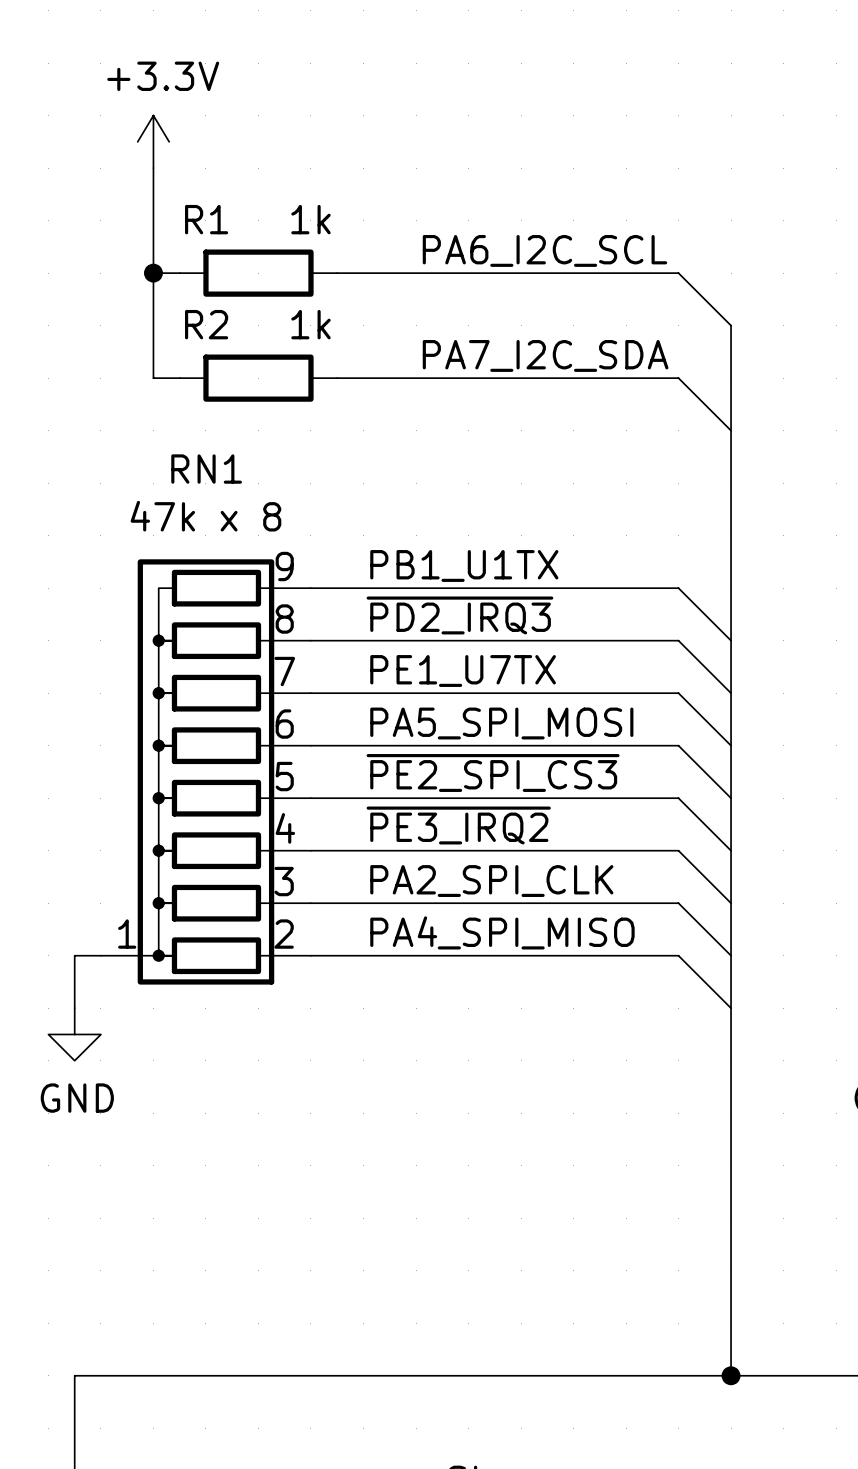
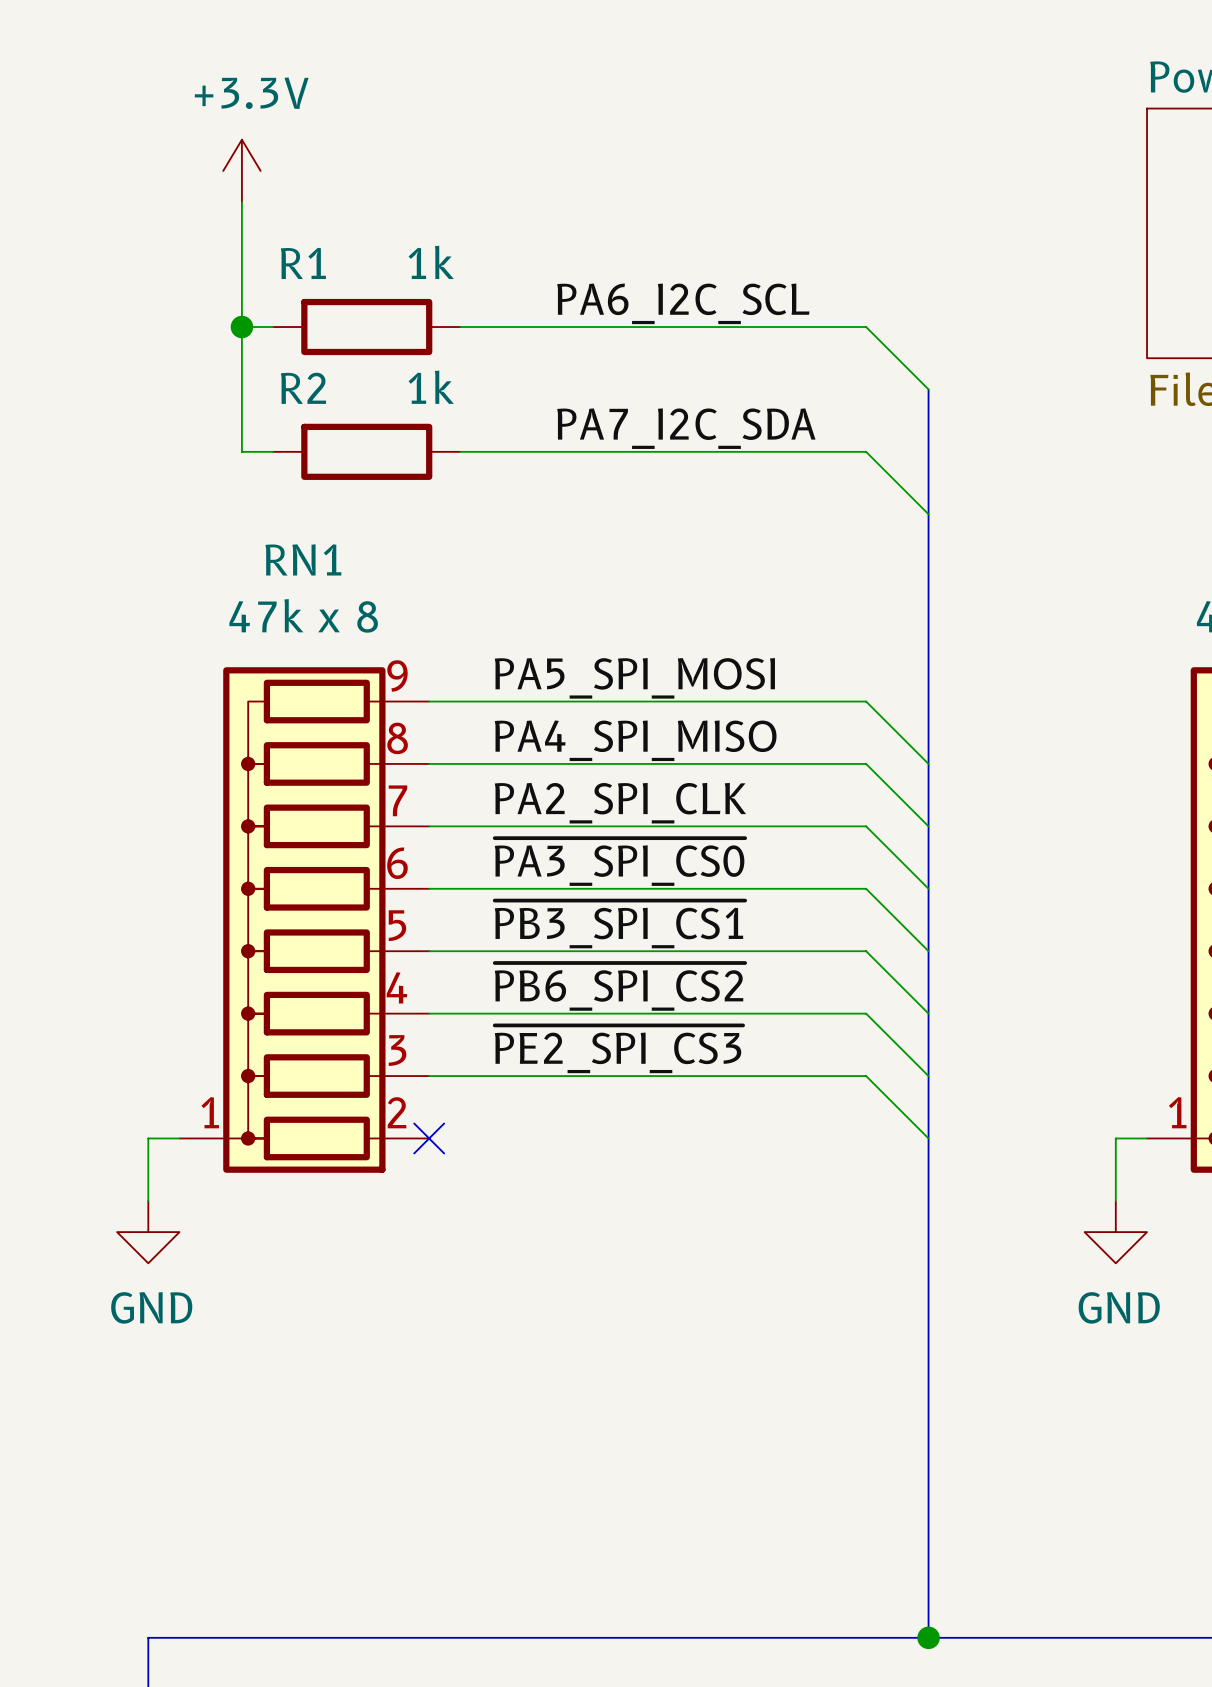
label: PB1_U1TX (464, 565) -> PA5_SPI_MOSI (634, 678)
label: ~{PD2_IRQ3} (459, 615) -> PA4_SPI_MISO (635, 740)
label: PE1_U7TX (463, 671) -> PA2_SPI_CLK (620, 803)
label: PA5_SPI_MOSI (501, 723) -> ~{PA3_SPI_CS0} (619, 862)
label: ~{PE2_SPI_CS3} (493, 772) -> ~{PB3_SPI_CS1} (619, 924)
label: ~{PE3_IRQ2} (458, 825) -> ~{PB6_SPI_CS2} (619, 986)
label: PA2_SPI_CLK (491, 881) -> ~{PE2_SPI_CS3} (618, 1049)
label: PA4_SPI_MISO (502, 932) -> none
wire: (310, 955) (678, 955) (731, 1008) -> none
no-connect mark: none -> (429, 1138)

